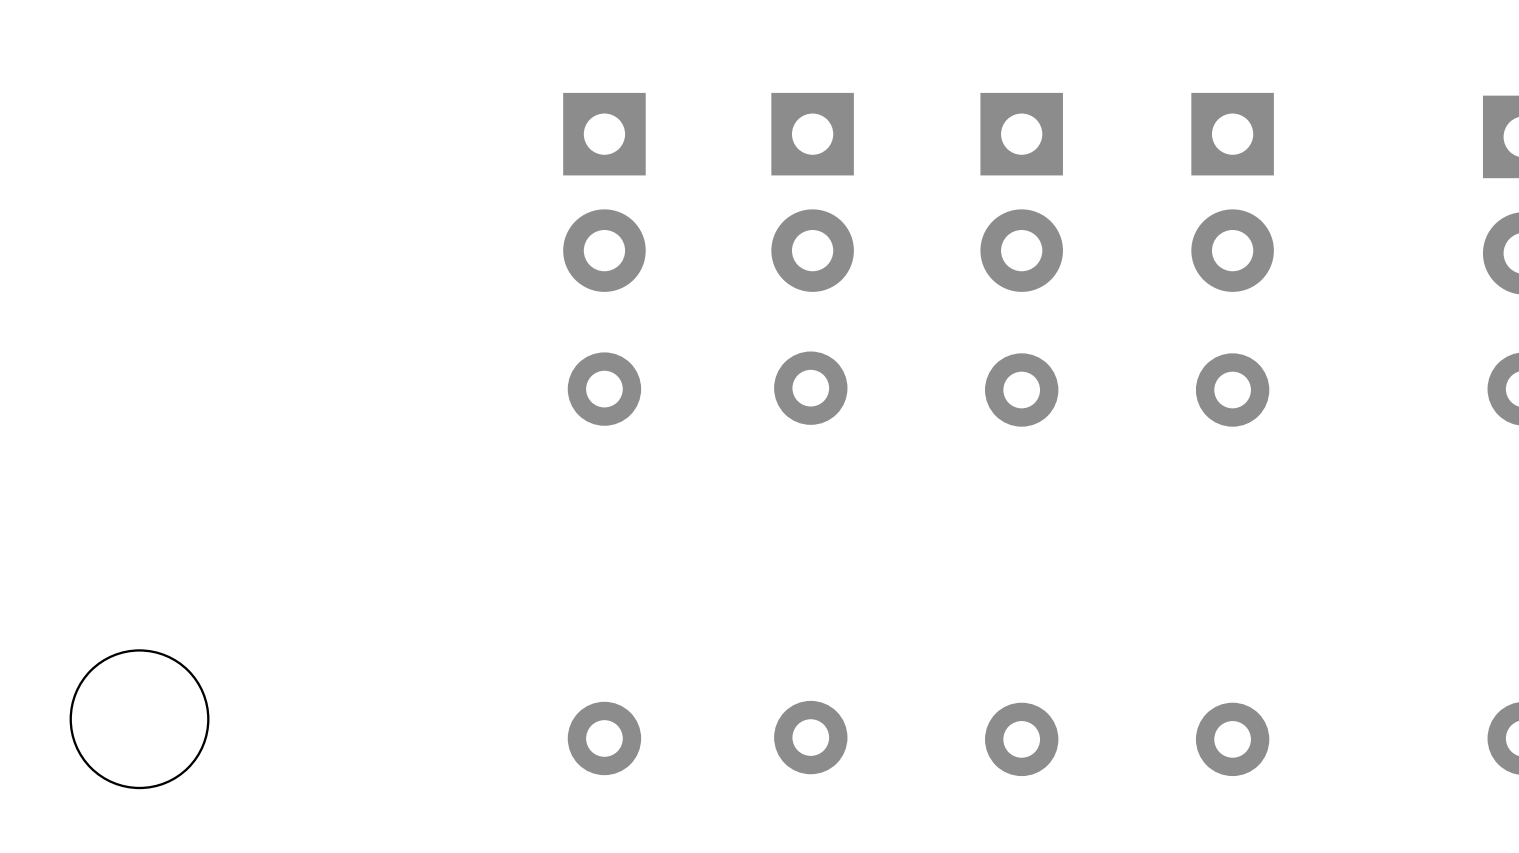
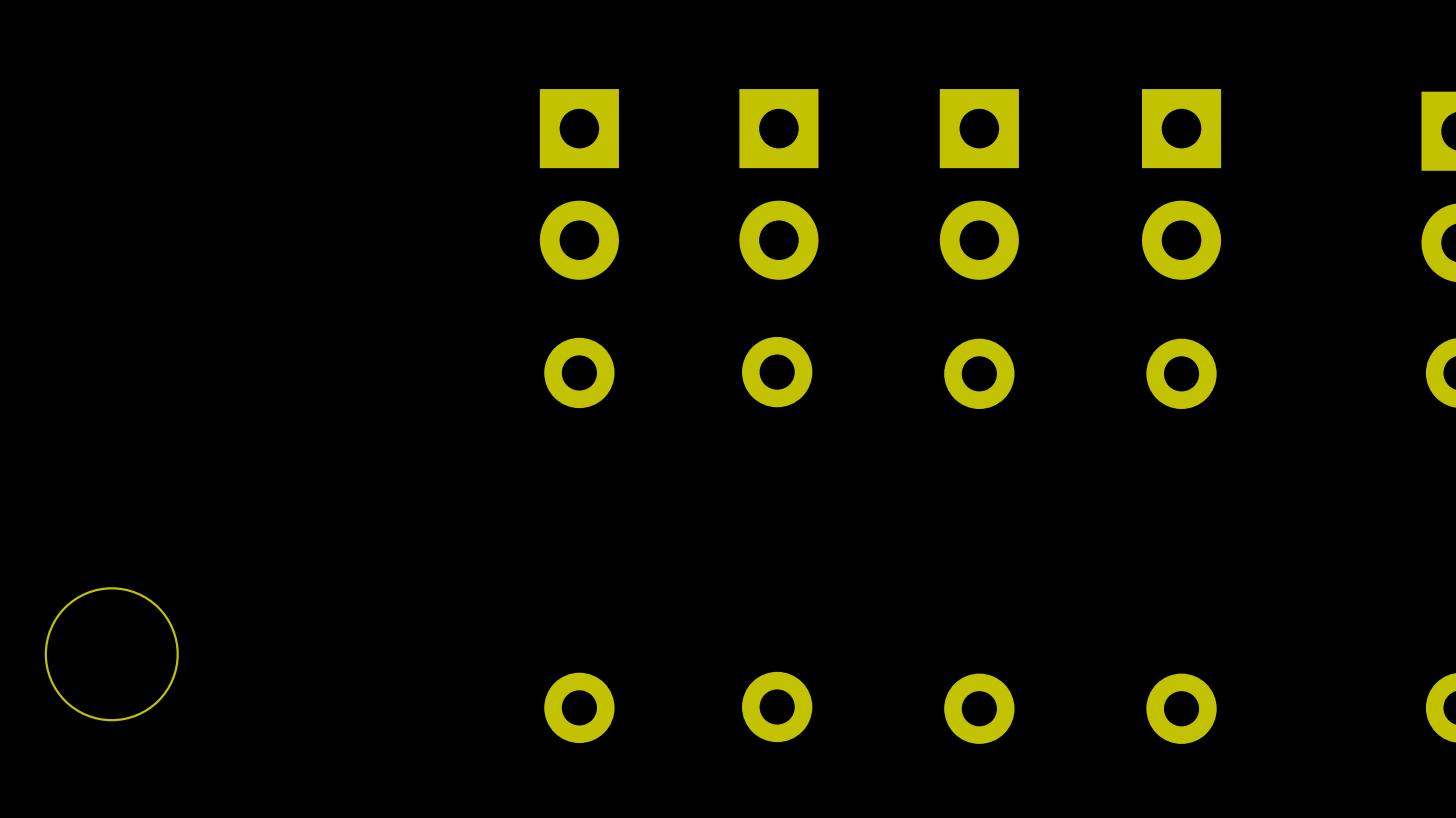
round board edge position: (139, 719) -> (111, 654)

